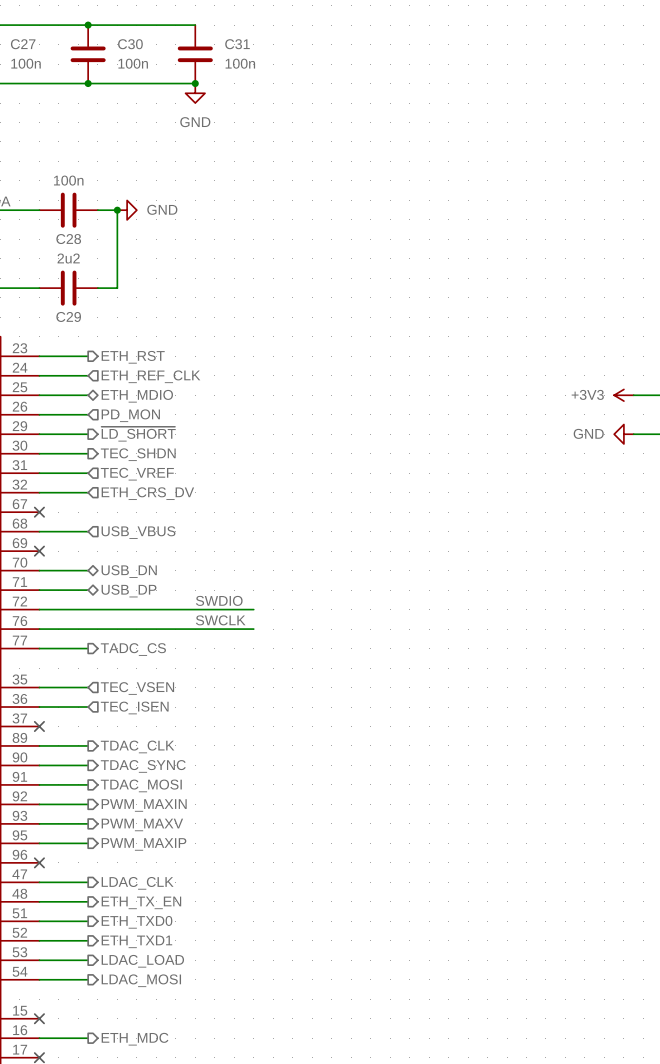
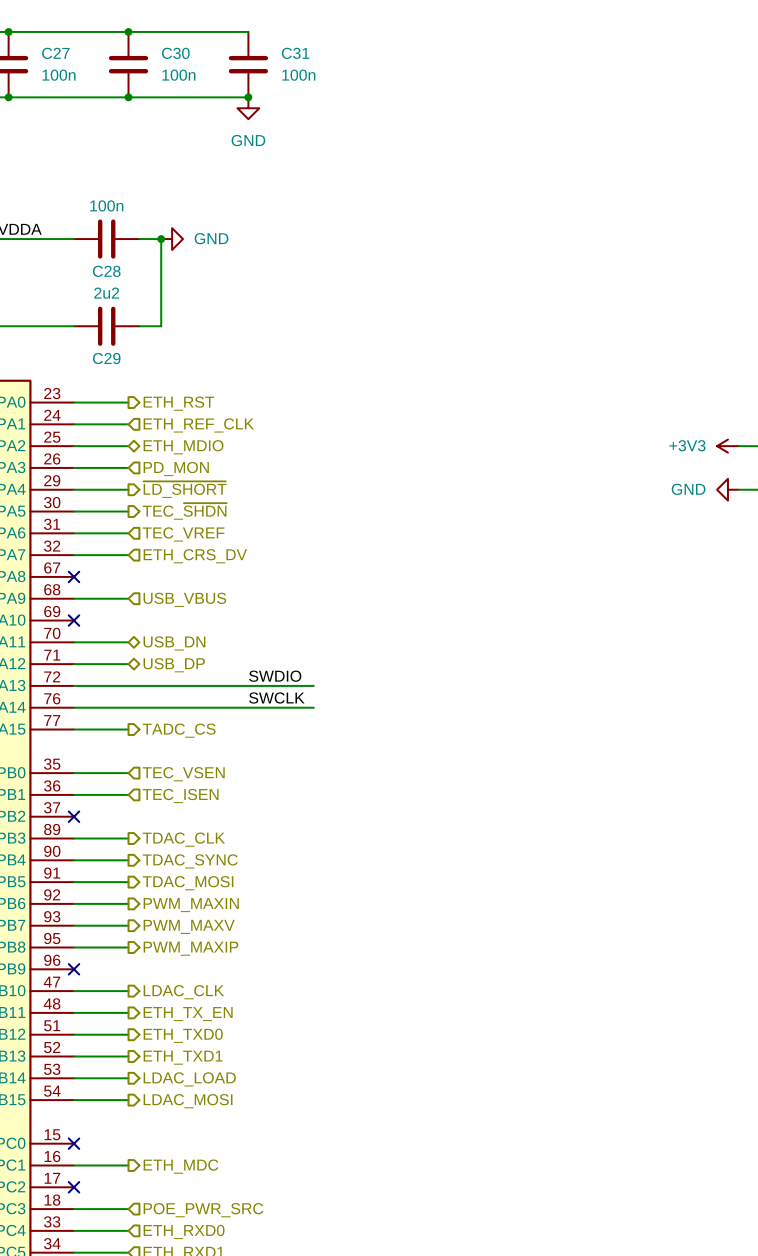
hierarchical label: TEC_SHDN (138, 454) -> TEC_~{SHDN} (184, 511)

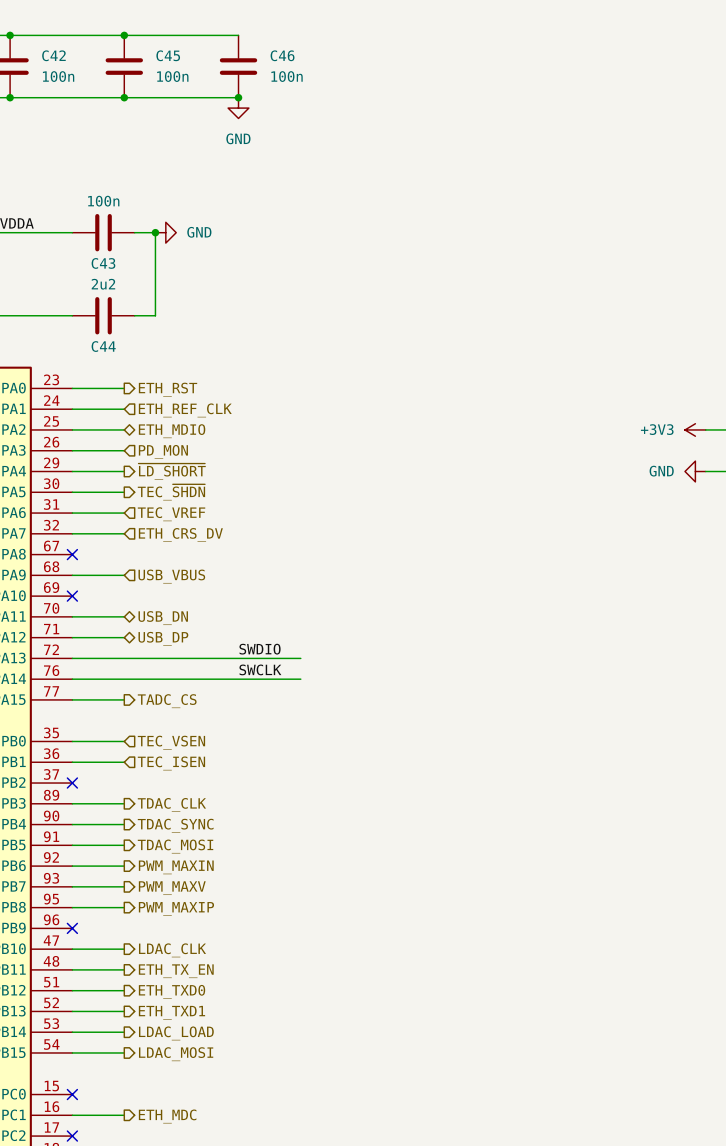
C27 name: C27 (55, 53) -> C42 (53, 55)
C30 name: C30 (175, 53) -> C45 (168, 55)
C31 name: C31 (295, 53) -> C46 (282, 55)
C28 name: C28 (106, 271) -> C43 (103, 263)
C29 name: C29 (106, 358) -> C44 (103, 346)

